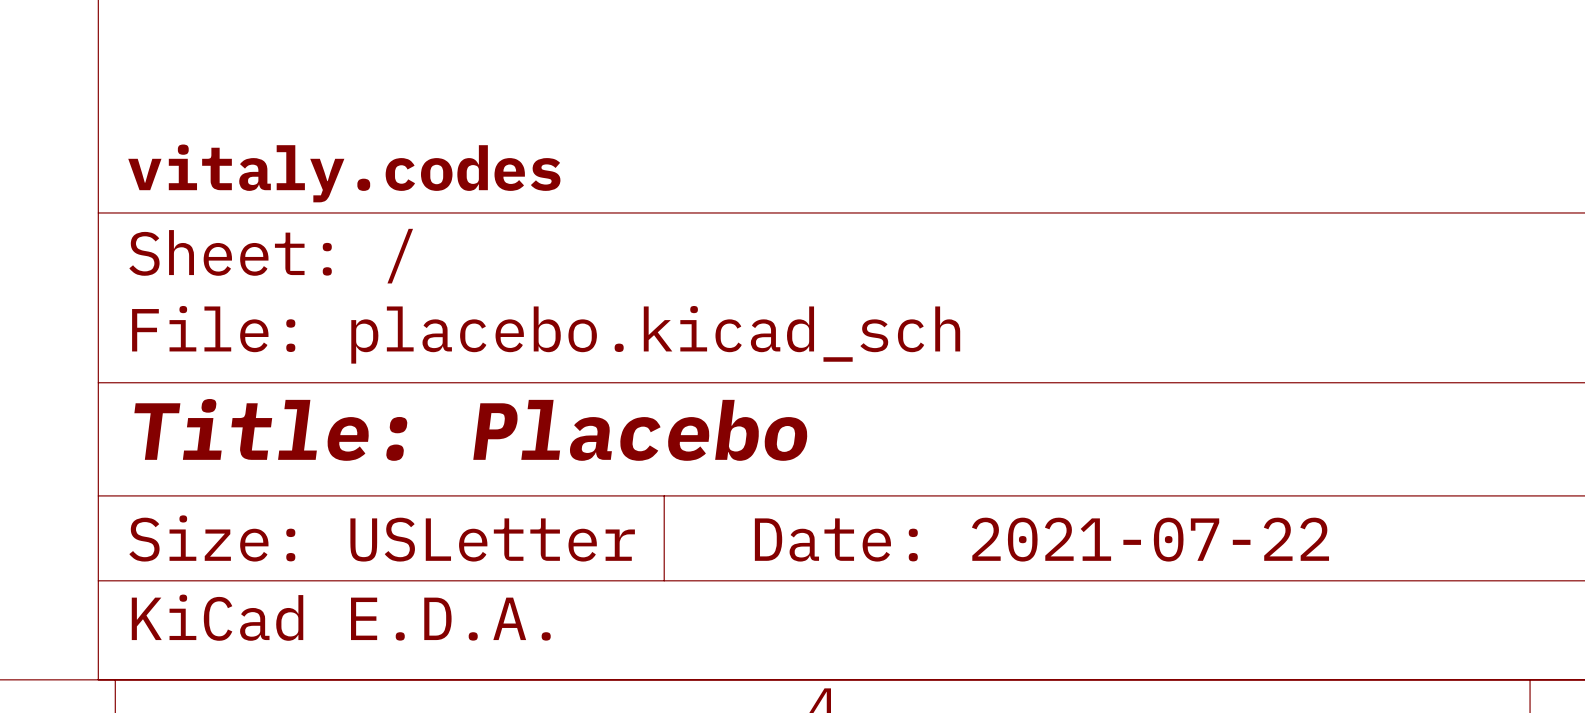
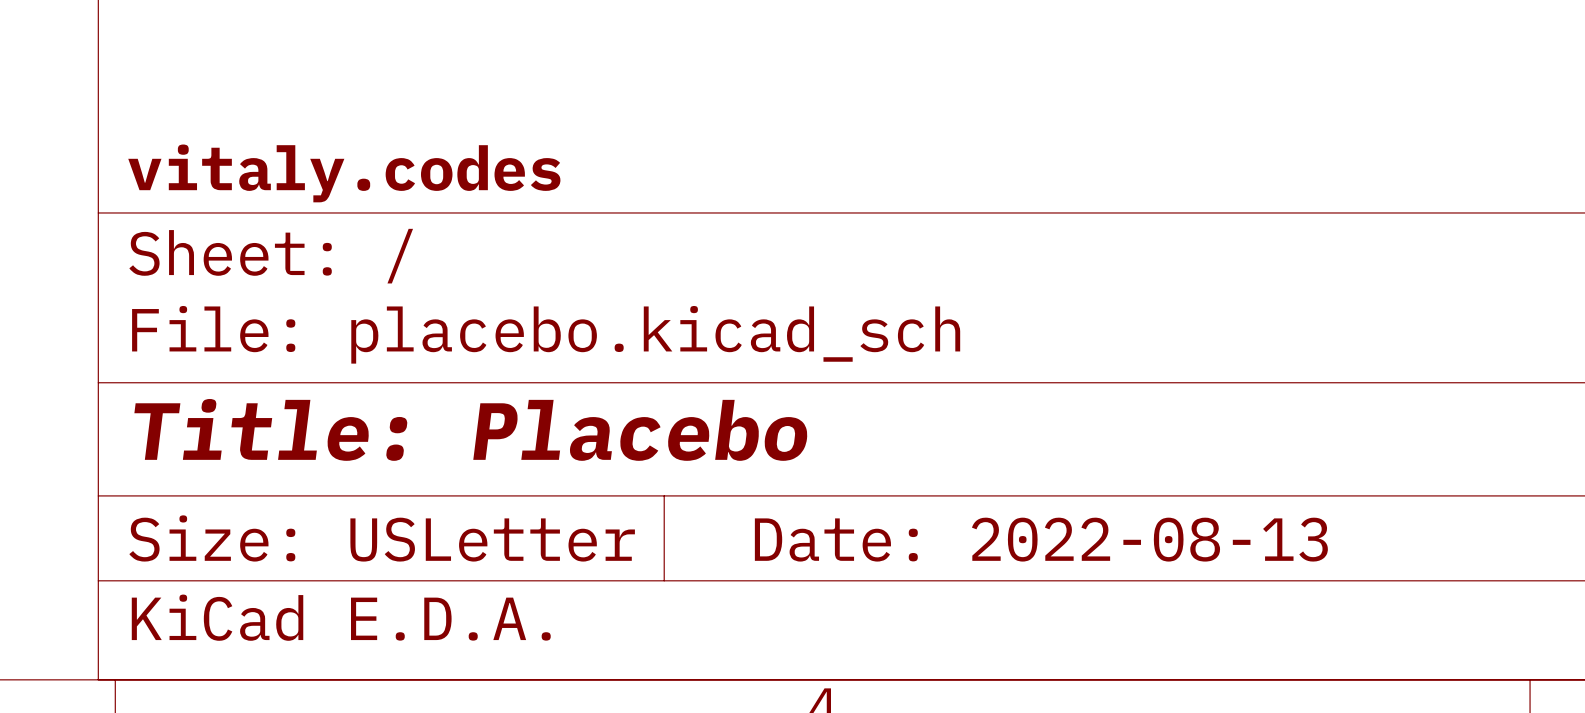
title block: Date: 2021-07-22 (1041, 539) -> Date: 2022-08-13 (1041, 539)

